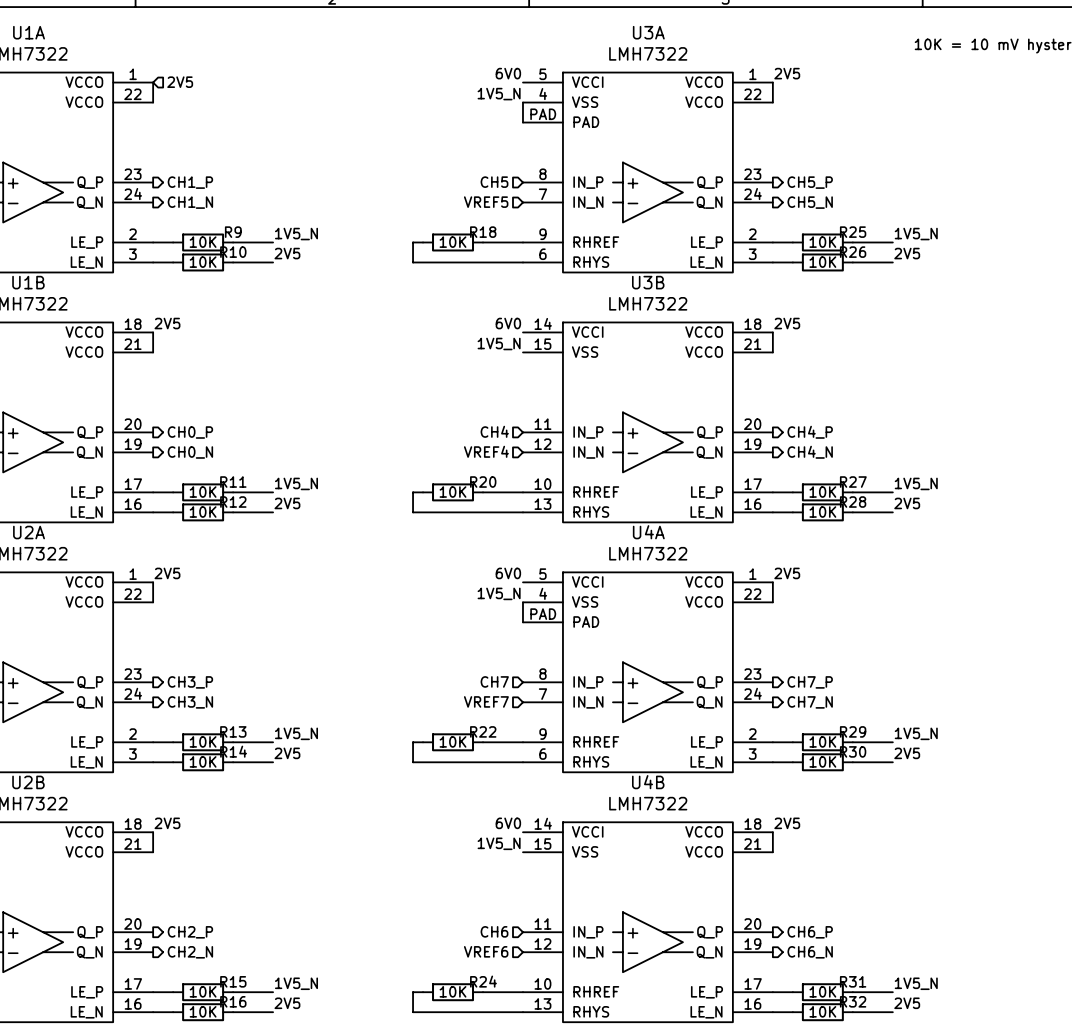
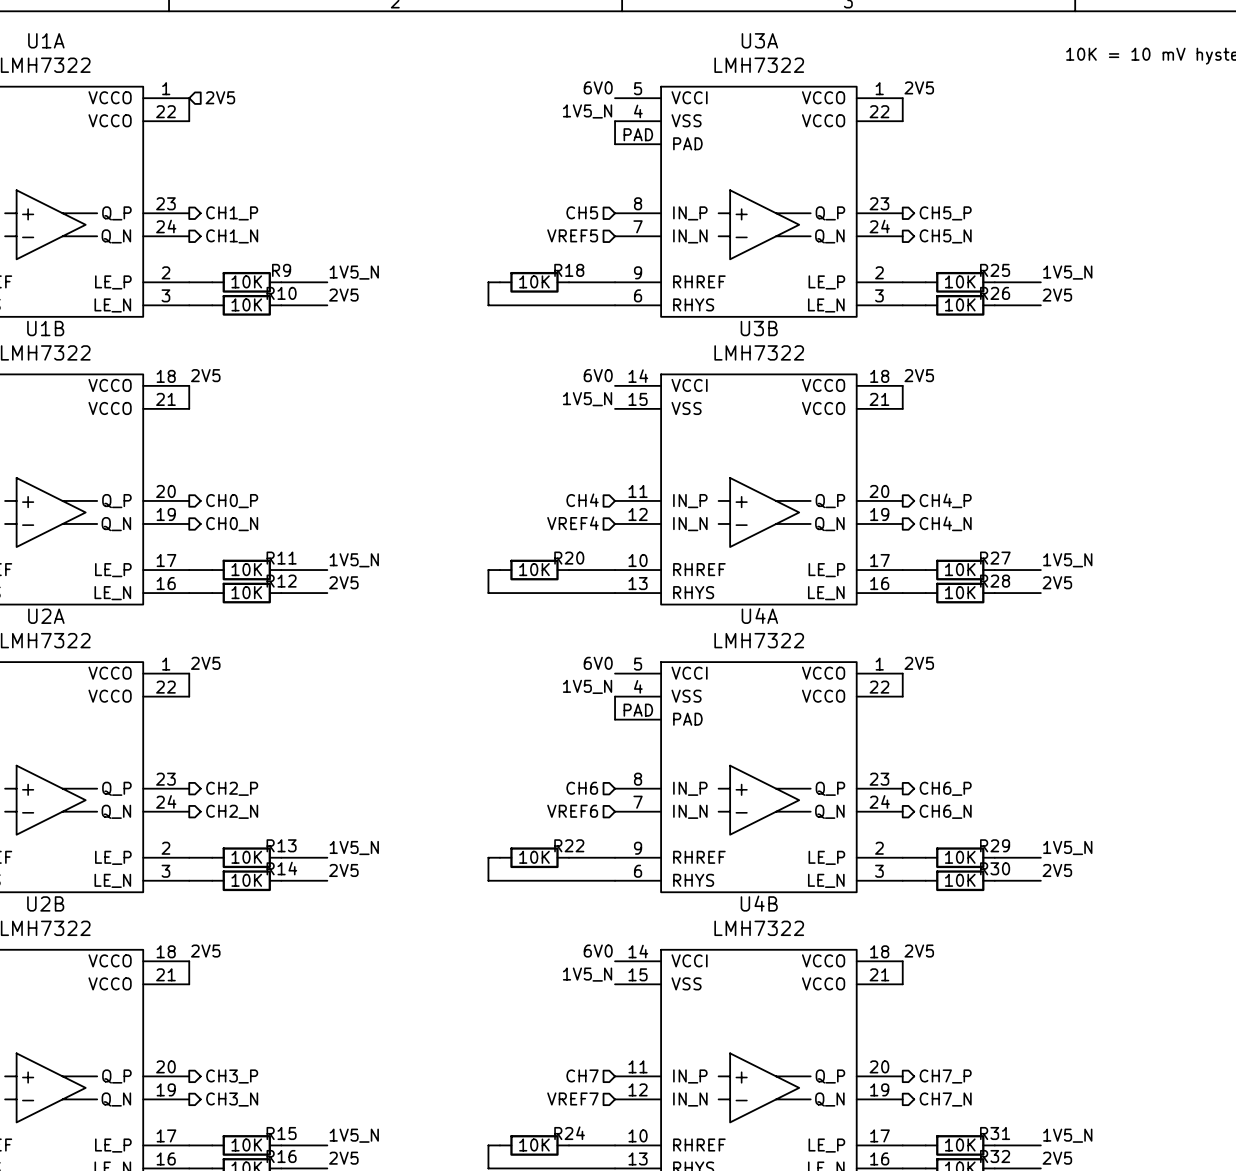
hierarchical label: CH7 (494, 681) -> CH6 (582, 788)
hierarchical label: CH3_P (190, 682) -> CH2_P (232, 788)
hierarchical label: CH7_P (810, 682) -> CH6_P (945, 788)
hierarchical label: VREF7 (486, 701) -> VREF6 (572, 811)
hierarchical label: CH3_N (190, 702) -> CH2_N (232, 811)
hierarchical label: CH7_N (810, 702) -> CH6_N (945, 811)
hierarchical label: CH6 (494, 931) -> CH7 (582, 1075)
hierarchical label: CH2_P (190, 932) -> CH3_P (232, 1076)
hierarchical label: CH6_P (810, 932) -> CH7_P (945, 1076)
hierarchical label: VREF6 (486, 951) -> VREF7 (572, 1098)
hierarchical label: CH2_N (190, 952) -> CH3_N (232, 1099)
hierarchical label: CH6_N (810, 952) -> CH7_N (945, 1099)

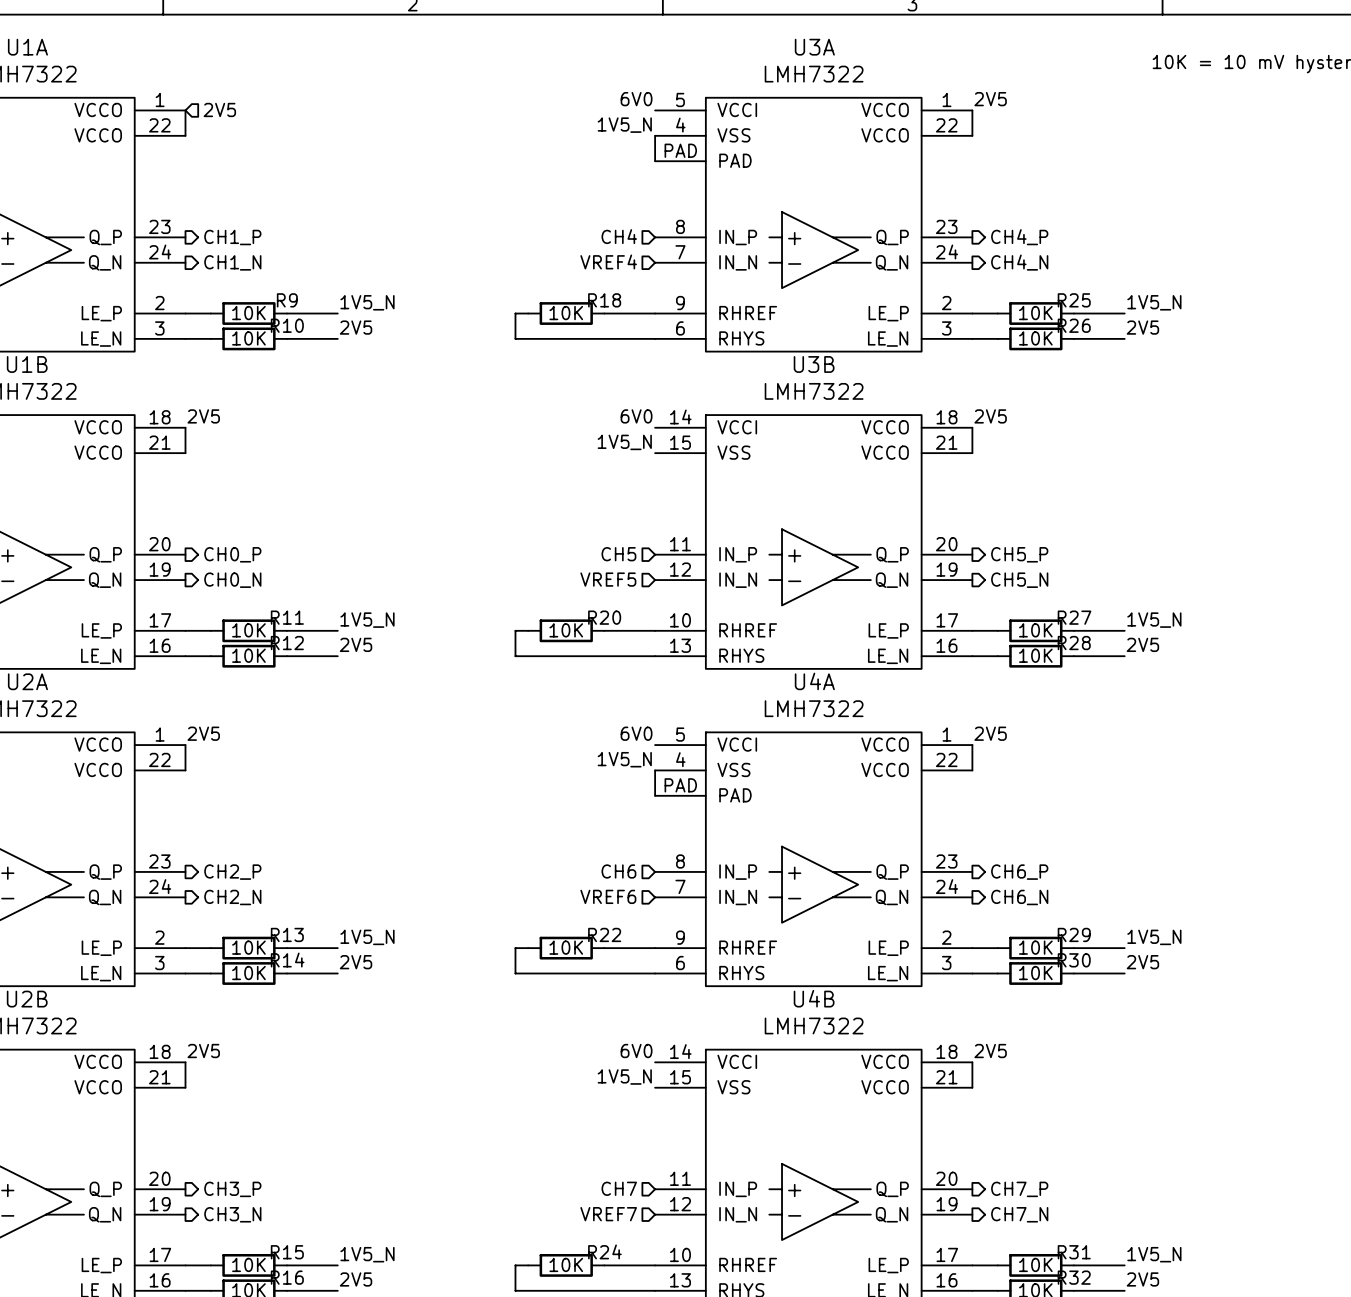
hierarchical label: CH5 (582, 212) -> CH4 (619, 236)
hierarchical label: CH5_P (945, 213) -> CH4_P (1019, 237)
hierarchical label: VREF5 (572, 235) -> VREF4 (608, 261)
hierarchical label: CH5_N (945, 236) -> CH4_N (1019, 262)
hierarchical label: CH4 (582, 500) -> CH5 (618, 554)
hierarchical label: CH4_P (945, 500) -> CH5_P (1019, 554)
hierarchical label: VREF4 (572, 523) -> VREF5 (608, 579)
hierarchical label: CH4_N (945, 523) -> CH5_N (1019, 580)

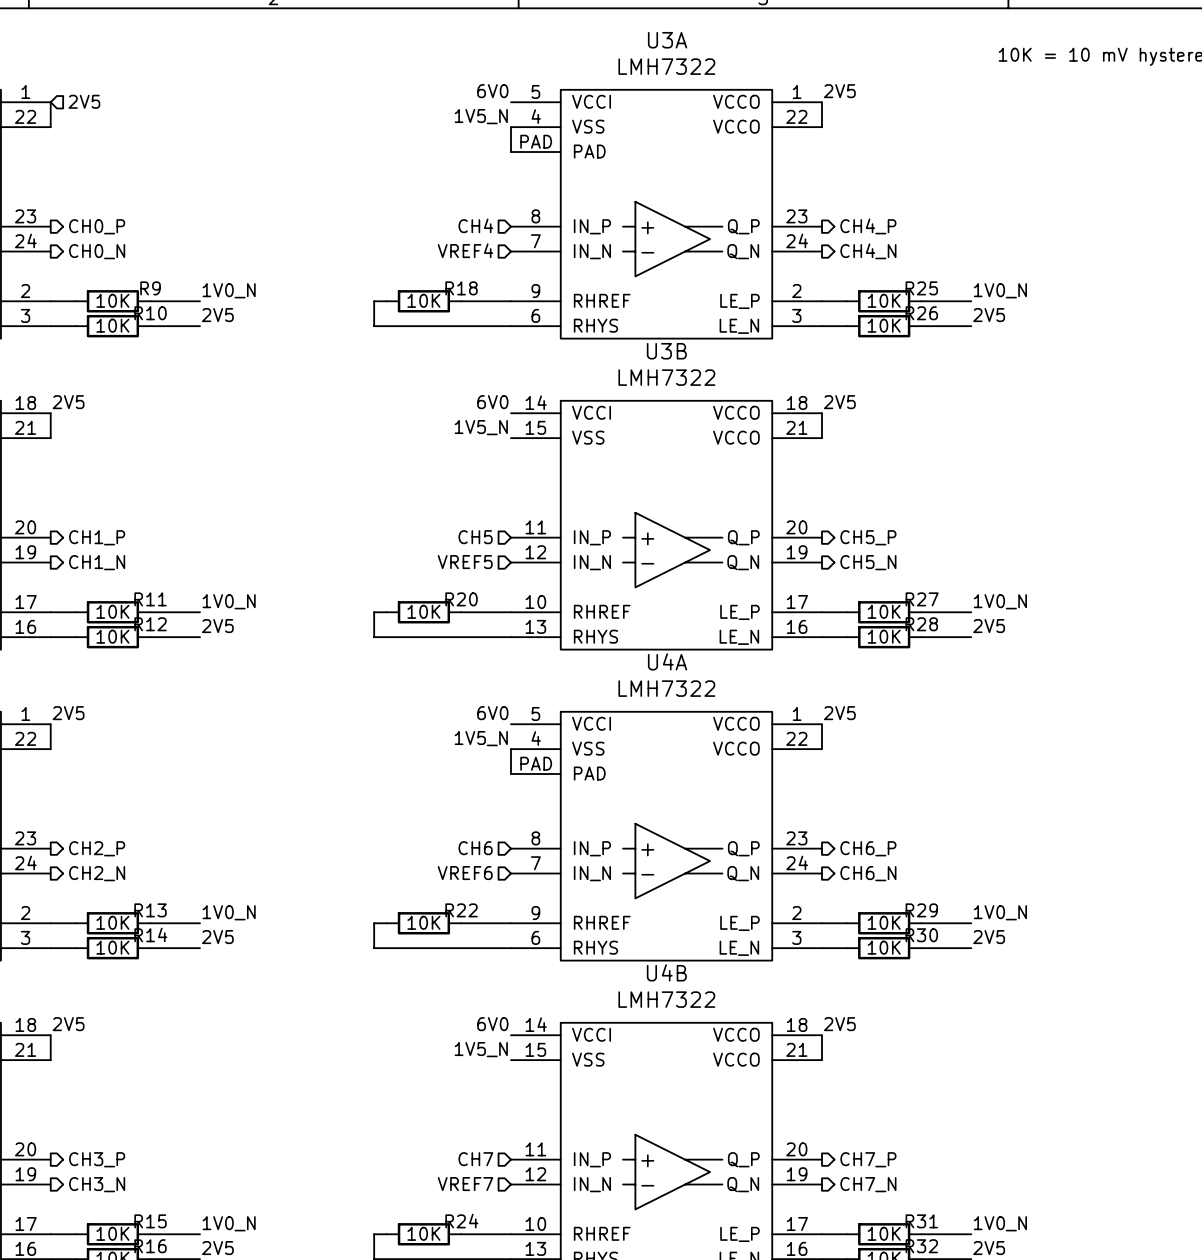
hierarchical label: CH1_P (232, 237) -> CH0_P (97, 226)
hierarchical label: CH1_N (232, 262) -> CH0_N (97, 251)
label: 1V5_N (367, 302) -> 1V0_N (229, 290)
label: 1V5_N (1154, 302) -> 1V0_N (1000, 290)
hierarchical label: CH0_P (232, 554) -> CH1_P (97, 537)
hierarchical label: CH0_N (232, 580) -> CH1_N (97, 562)
label: 1V5_N (367, 620) -> 1V0_N (229, 601)
label: 1V5_N (1154, 620) -> 1V0_N (1000, 601)
label: 1V5_N (367, 937) -> 1V0_N (229, 912)
label: 1V5_N (1154, 937) -> 1V0_N (1000, 912)
label: 1V5_N (367, 1254) -> 1V0_N (229, 1223)
label: 1V5_N (1154, 1254) -> 1V0_N (1000, 1223)

